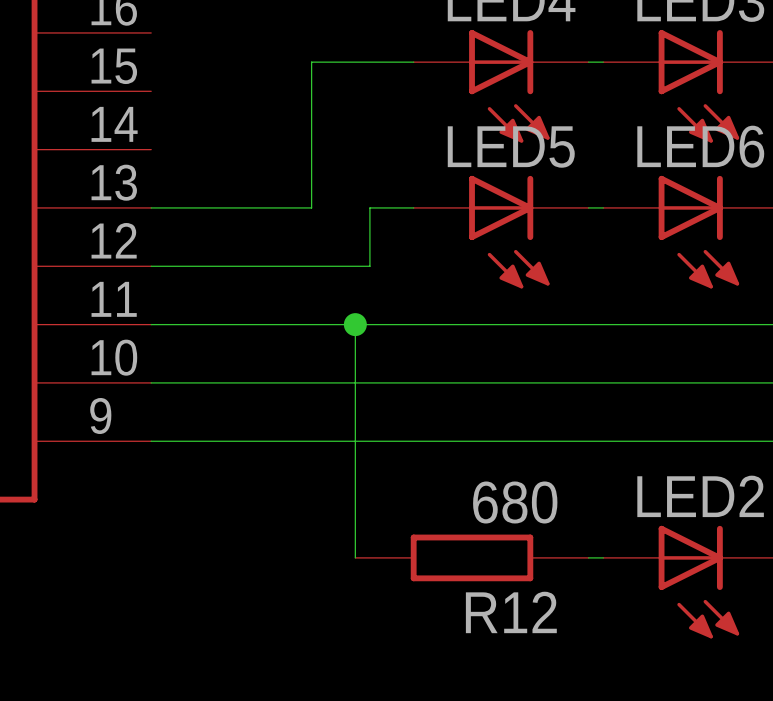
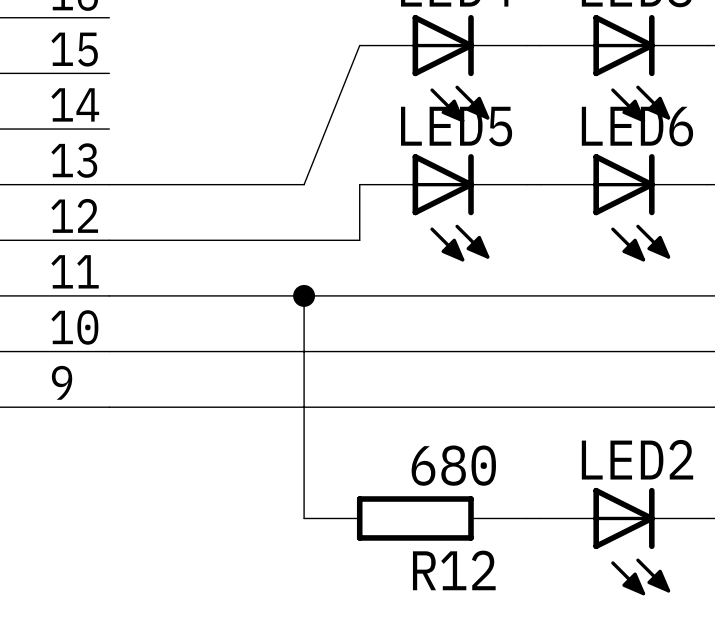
wire: (413, 62) (311, 62) (311, 207) -> (359, 45) (304, 184) (262, 184)
wire: (413, 207) (369, 207) (369, 266) -> (359, 184) (359, 240) (317, 240)

